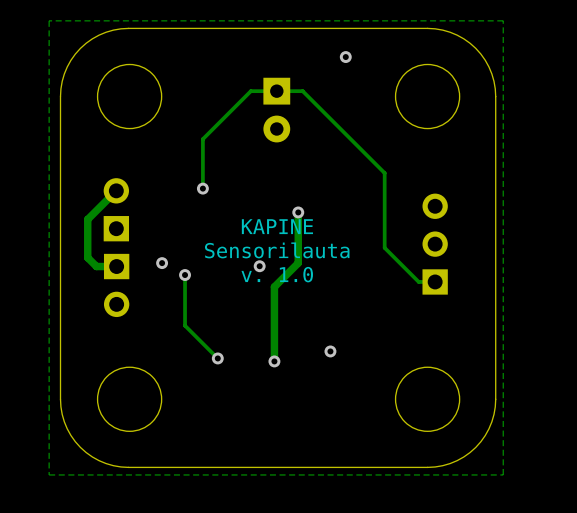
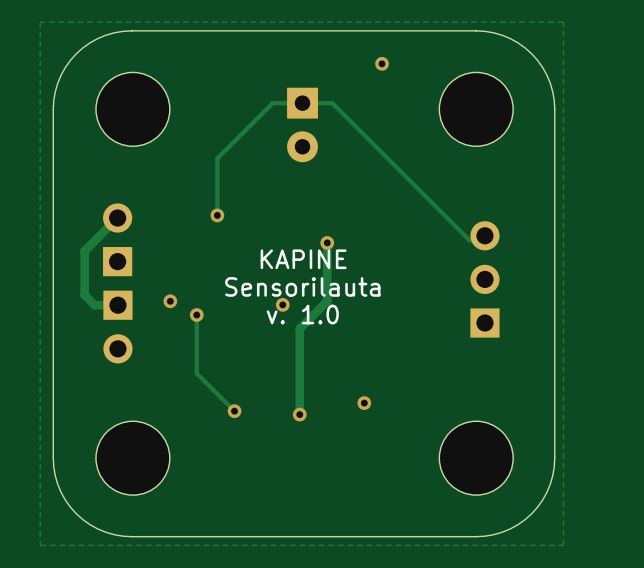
track: (384, 173) (384, 247) (418, 281) (435, 281) -> (426, 197) (469, 240) (485, 240)

